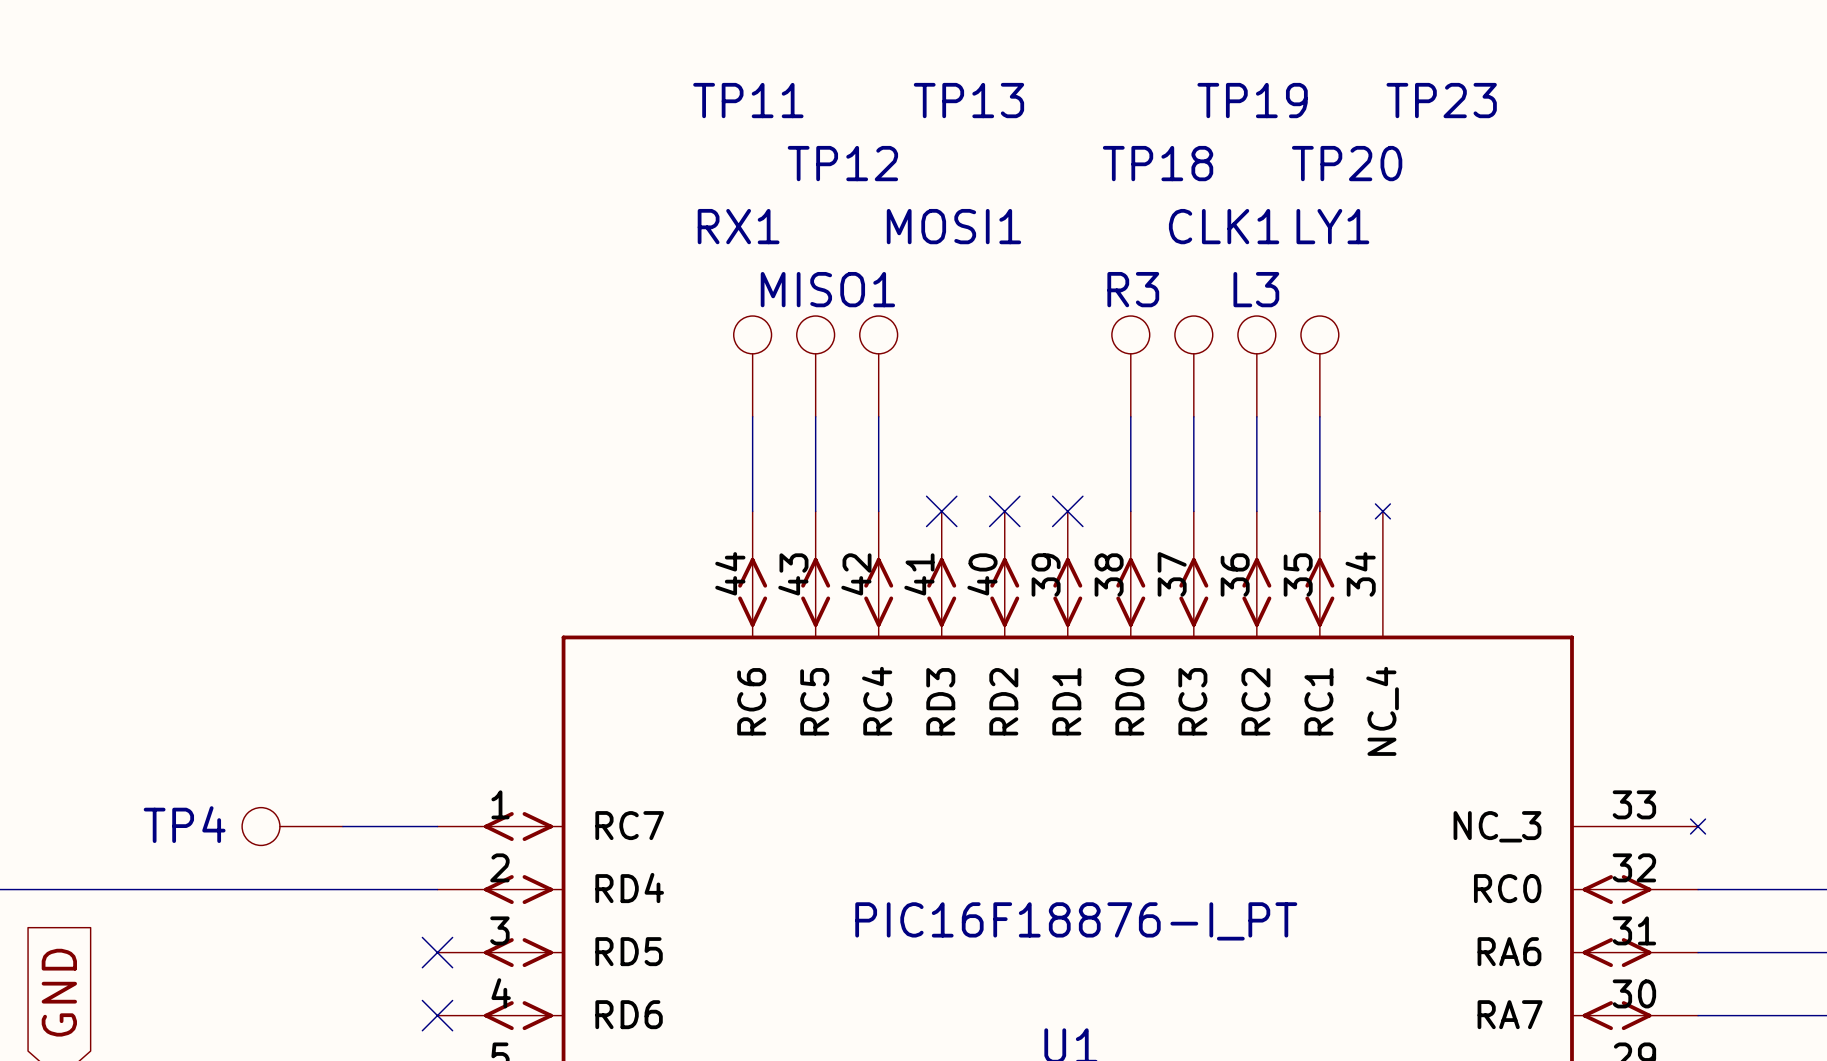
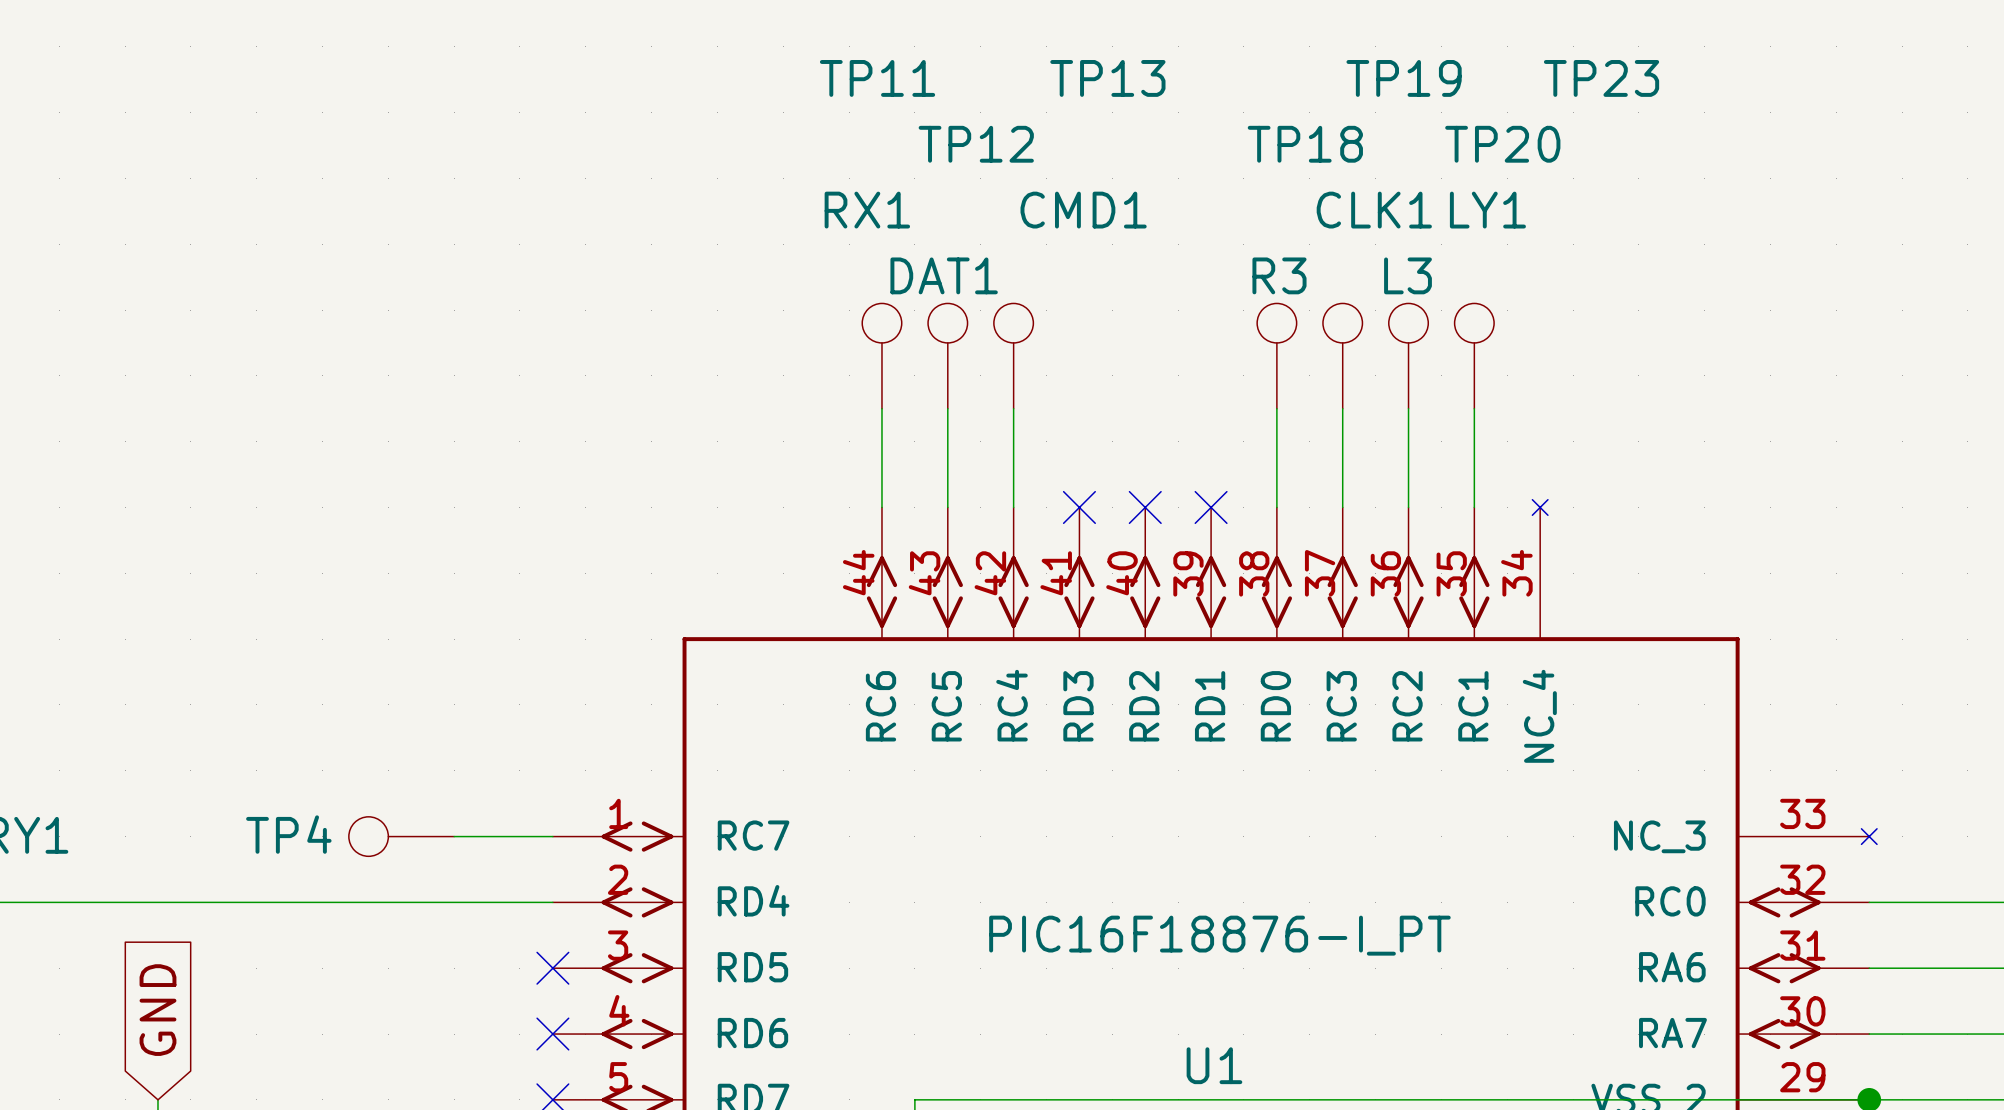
MOSI1 name: MOSI1 (953, 226) -> CMD1 (1083, 210)
MISO1 name: MISO1 (827, 289) -> DAT1 (944, 275)

